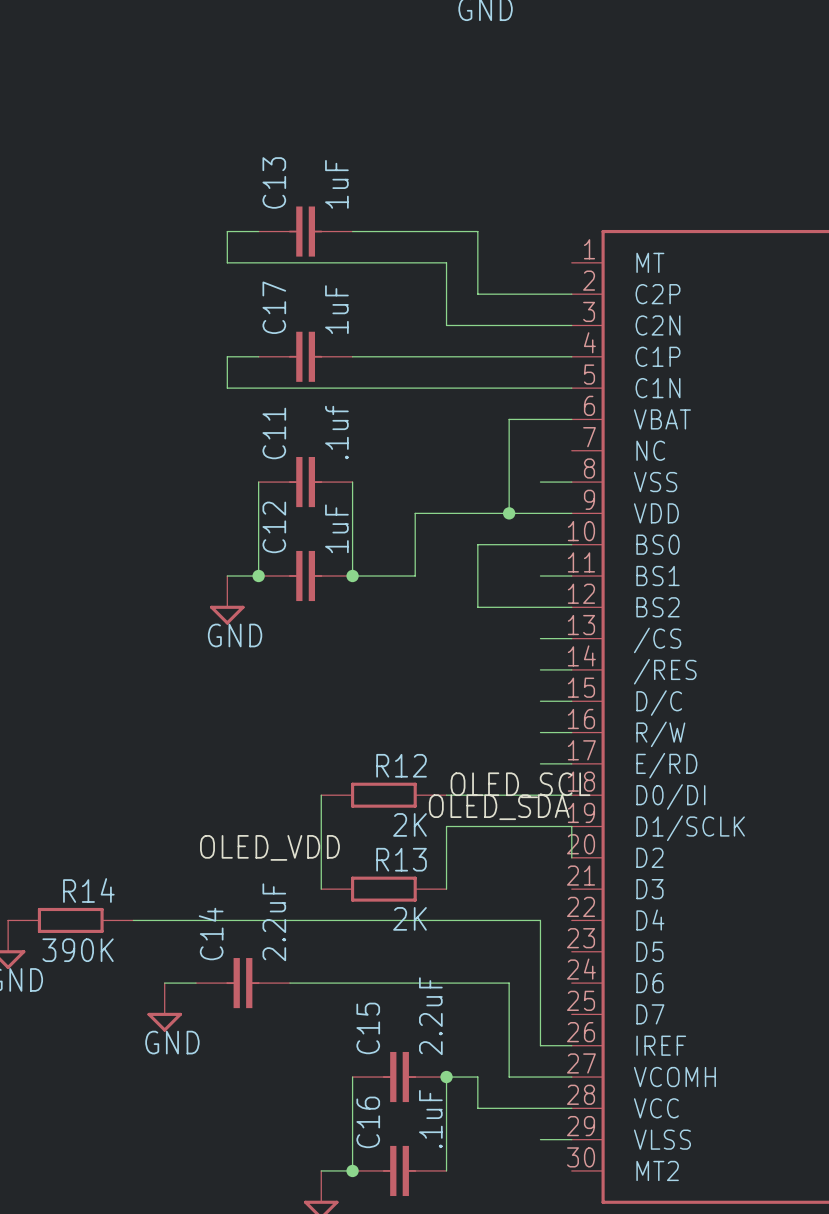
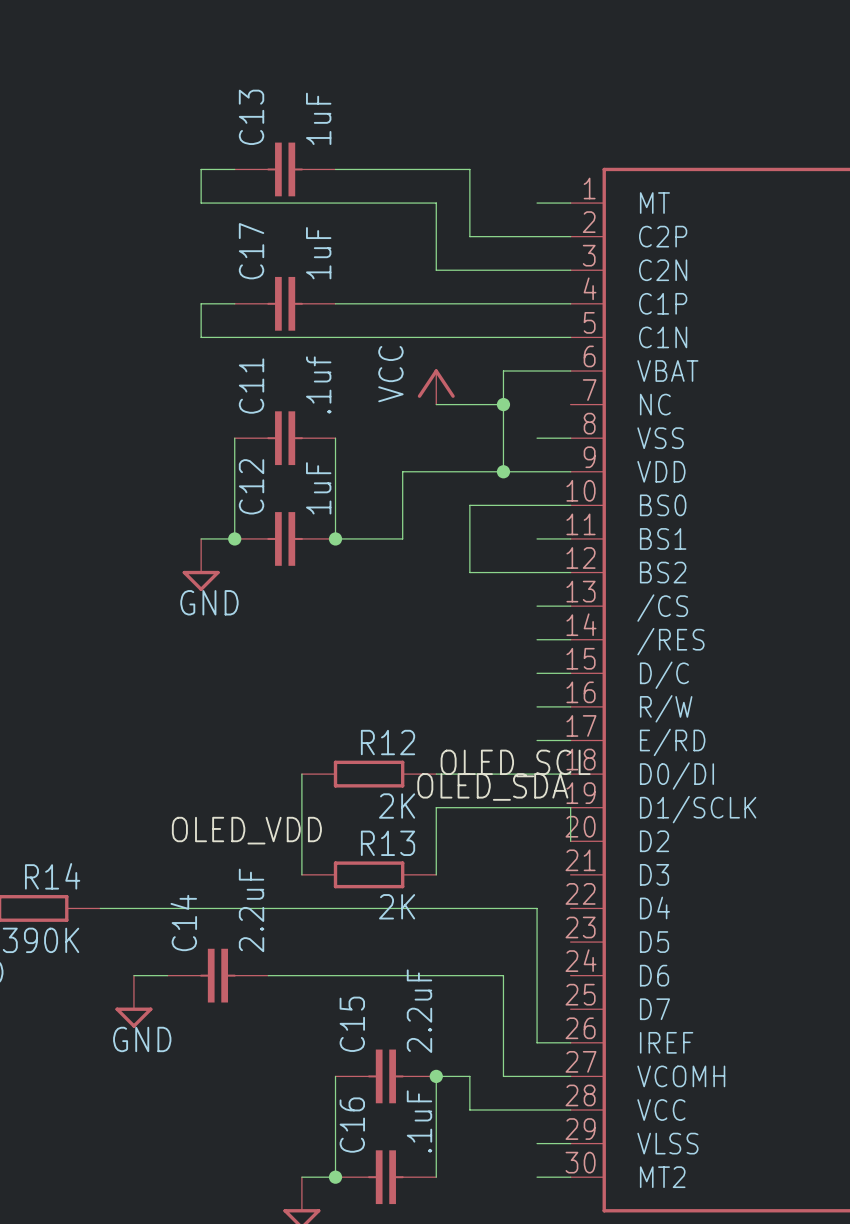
wire: none -> (537, 203) (570, 203)
power symbol: none -> VCC (436, 386)
wire: none -> (436, 404) (503, 404)
junction: none -> (503, 404)
wire: none -> (537, 1177) (570, 1177)

